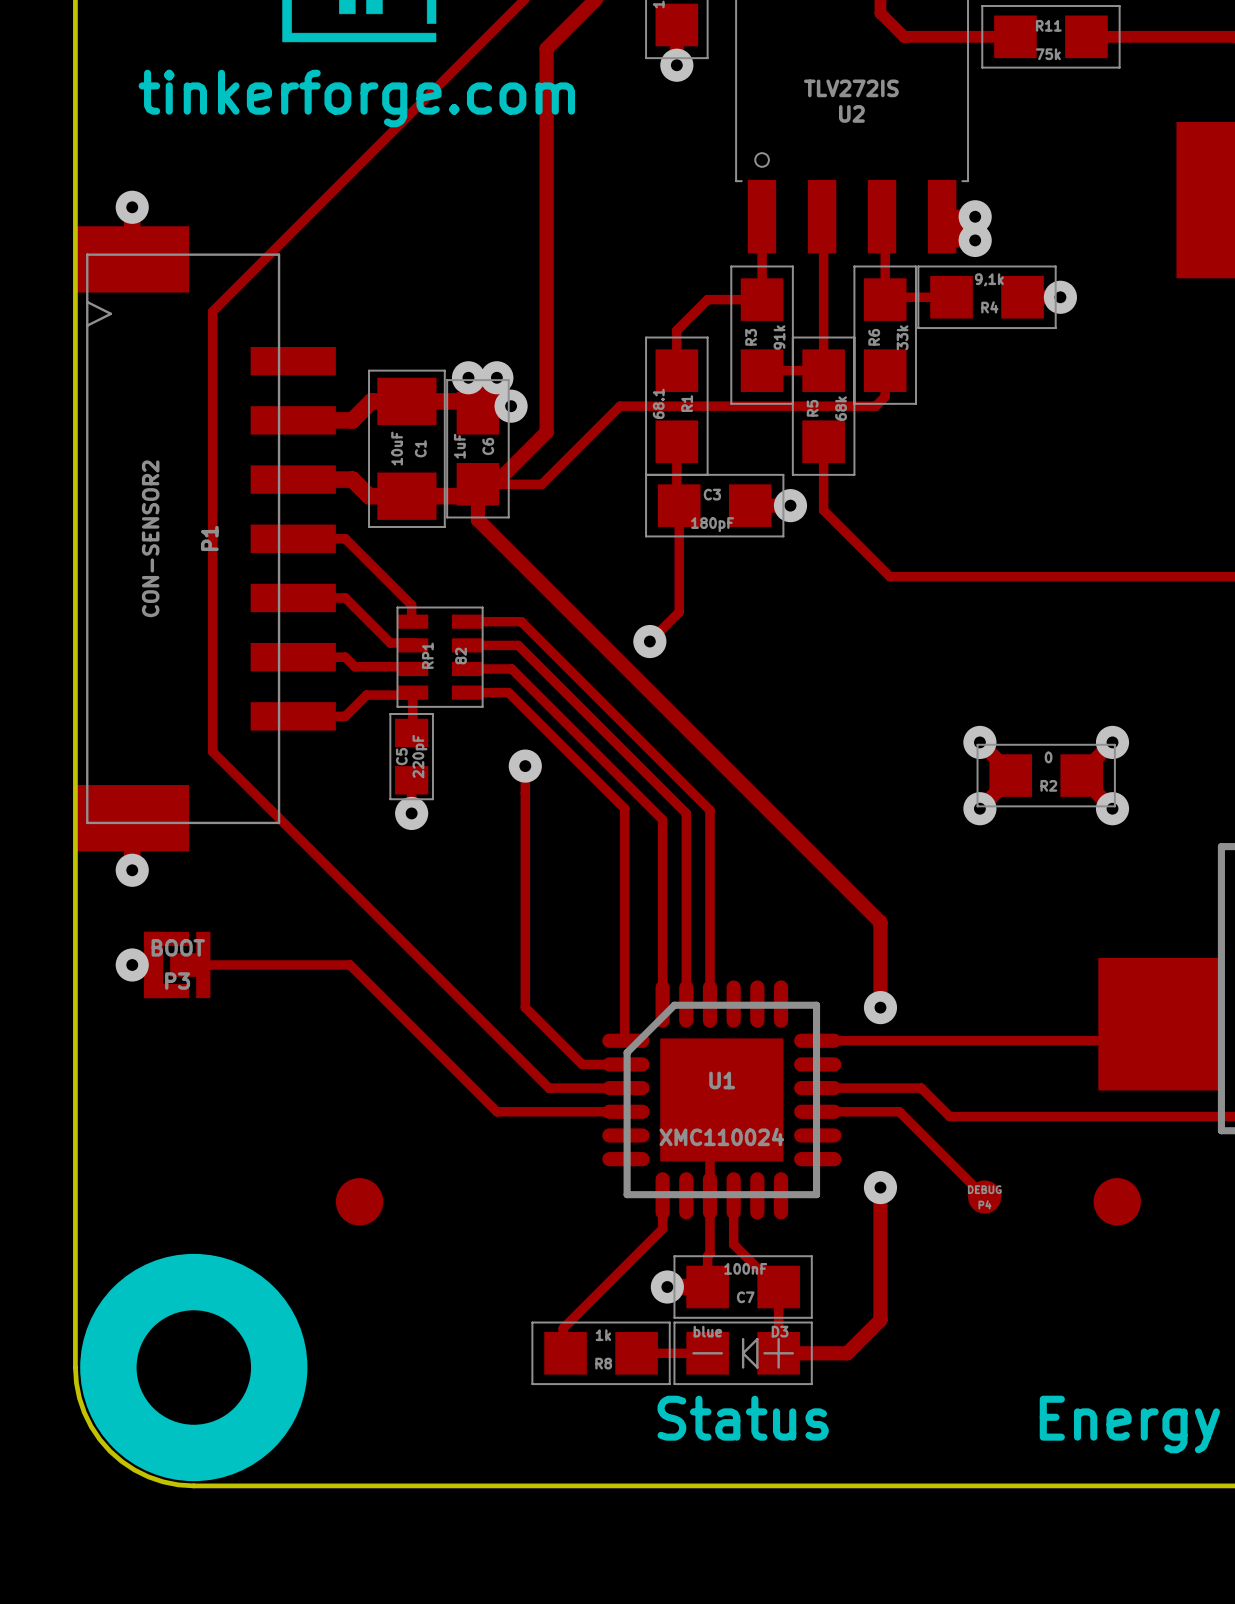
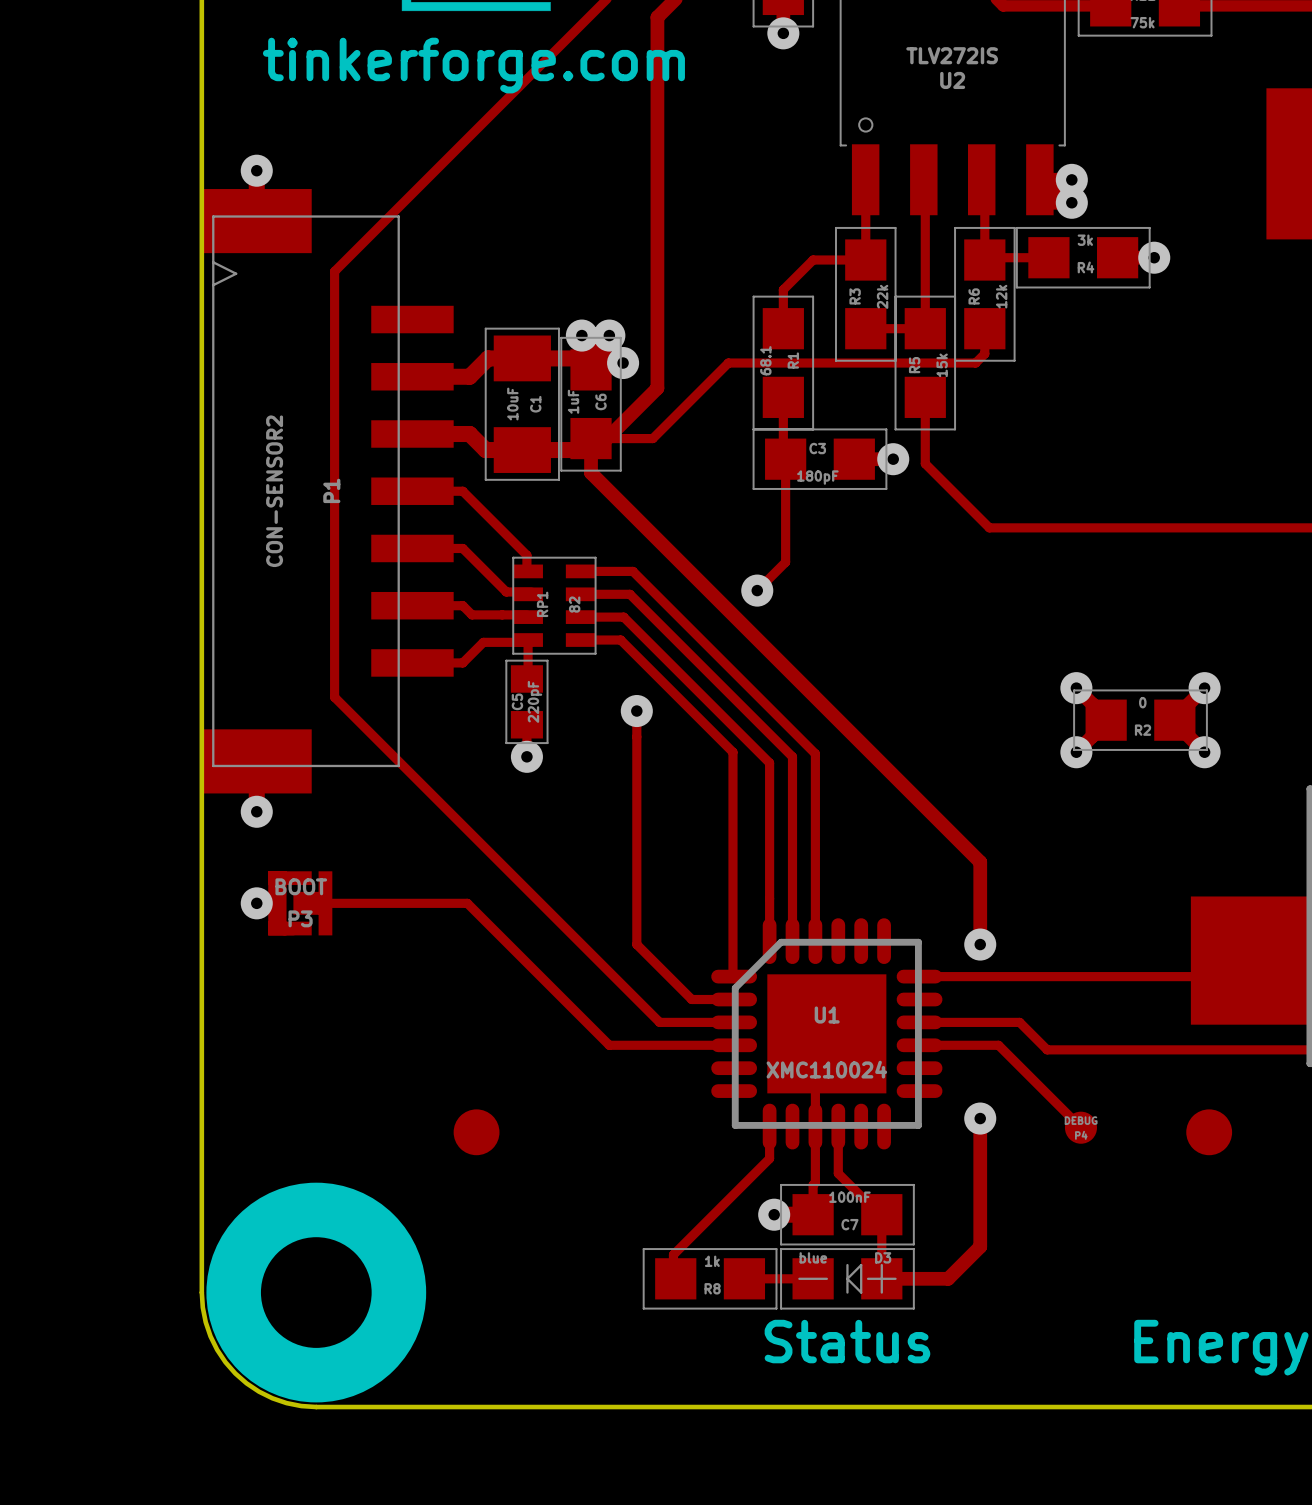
R4 value: 9,1k (989, 279) -> 3k (1085, 240)
R3 value: 91k (779, 337) -> 22k (882, 296)
R6 value: 33k (902, 337) -> 12k (1001, 296)
R5 value: 68k (841, 408) -> 15k (942, 365)

